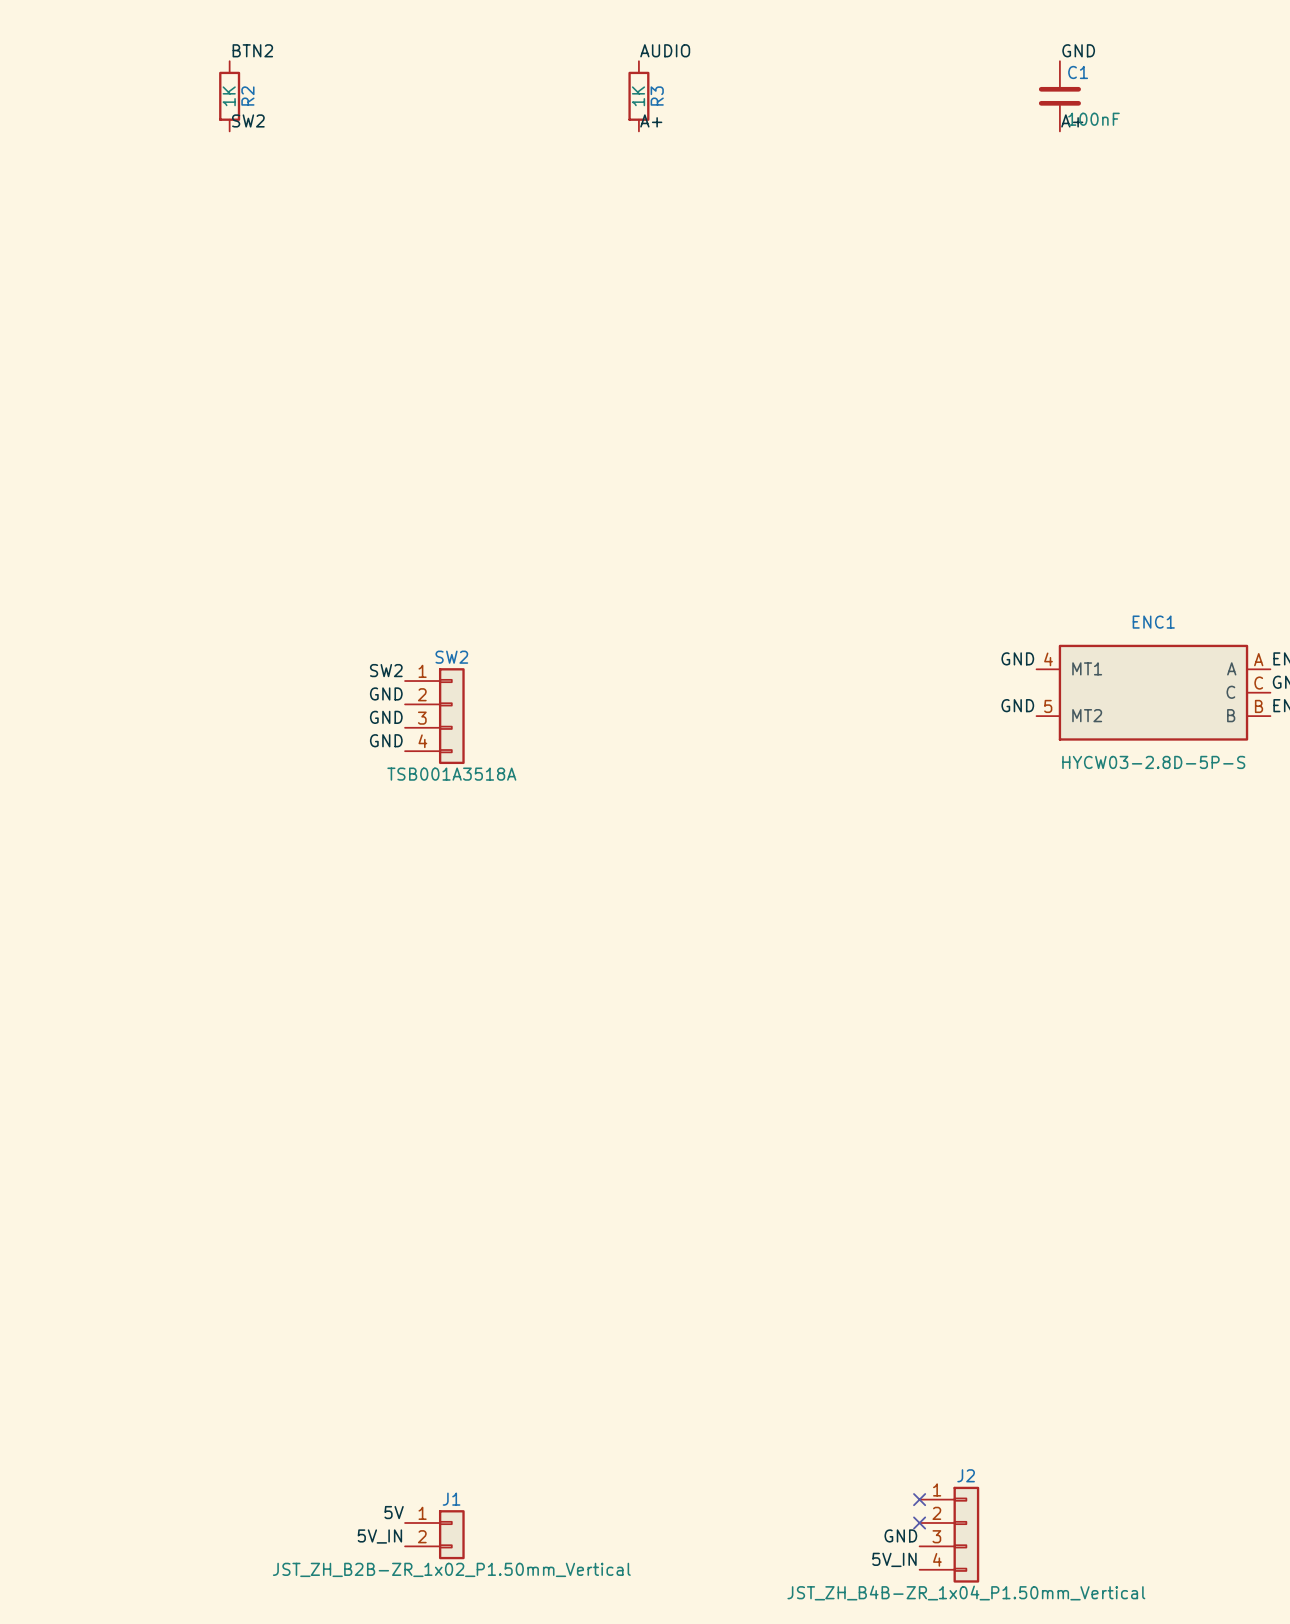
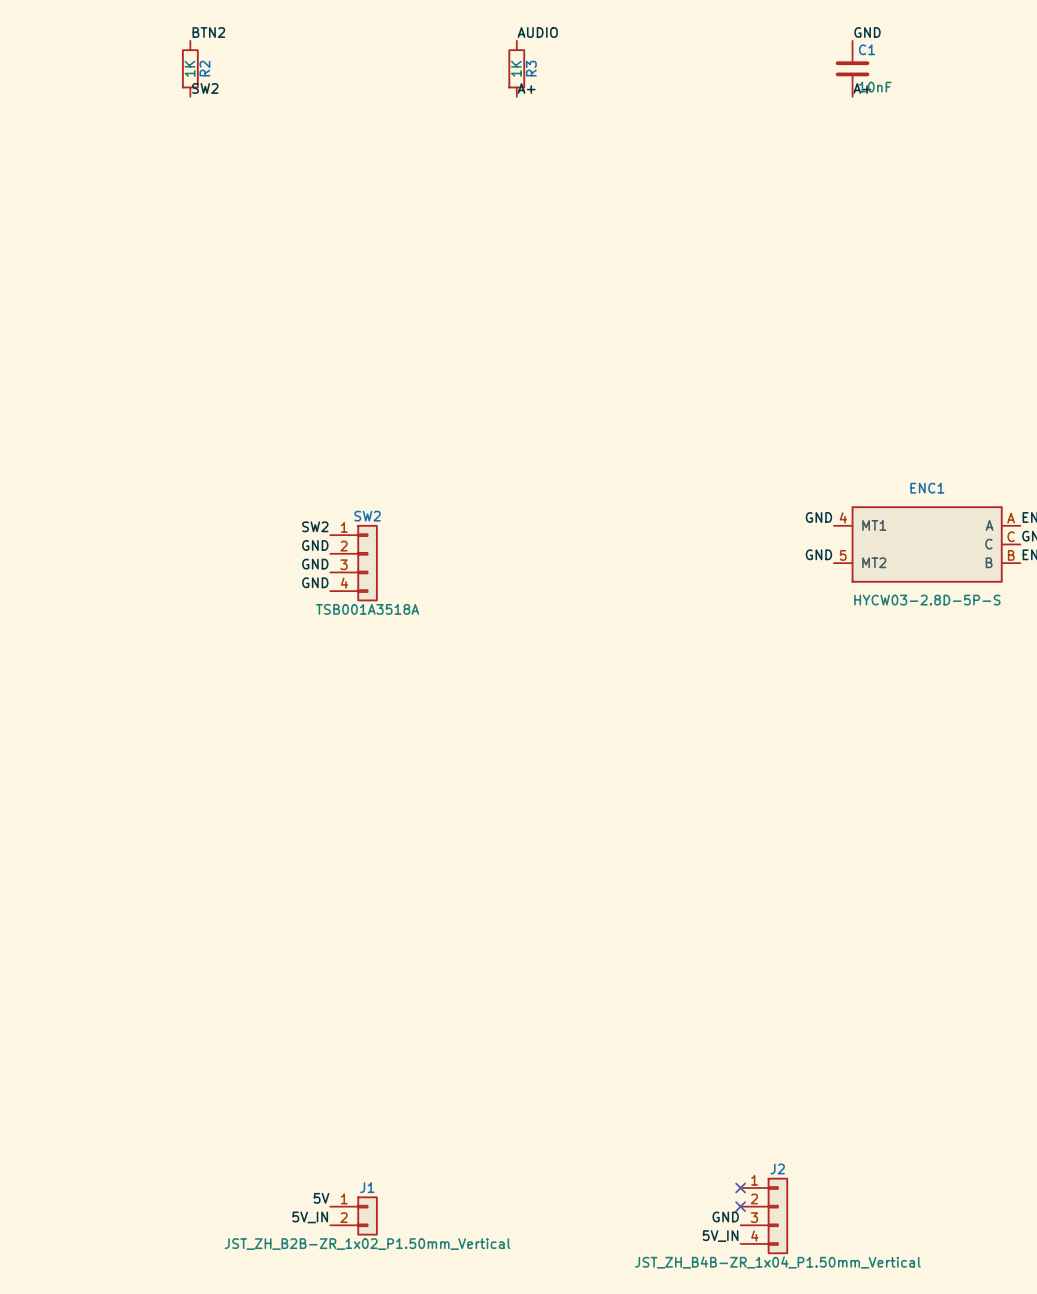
C1 value: 100nF (1093, 119) -> 10nF (875, 87)

